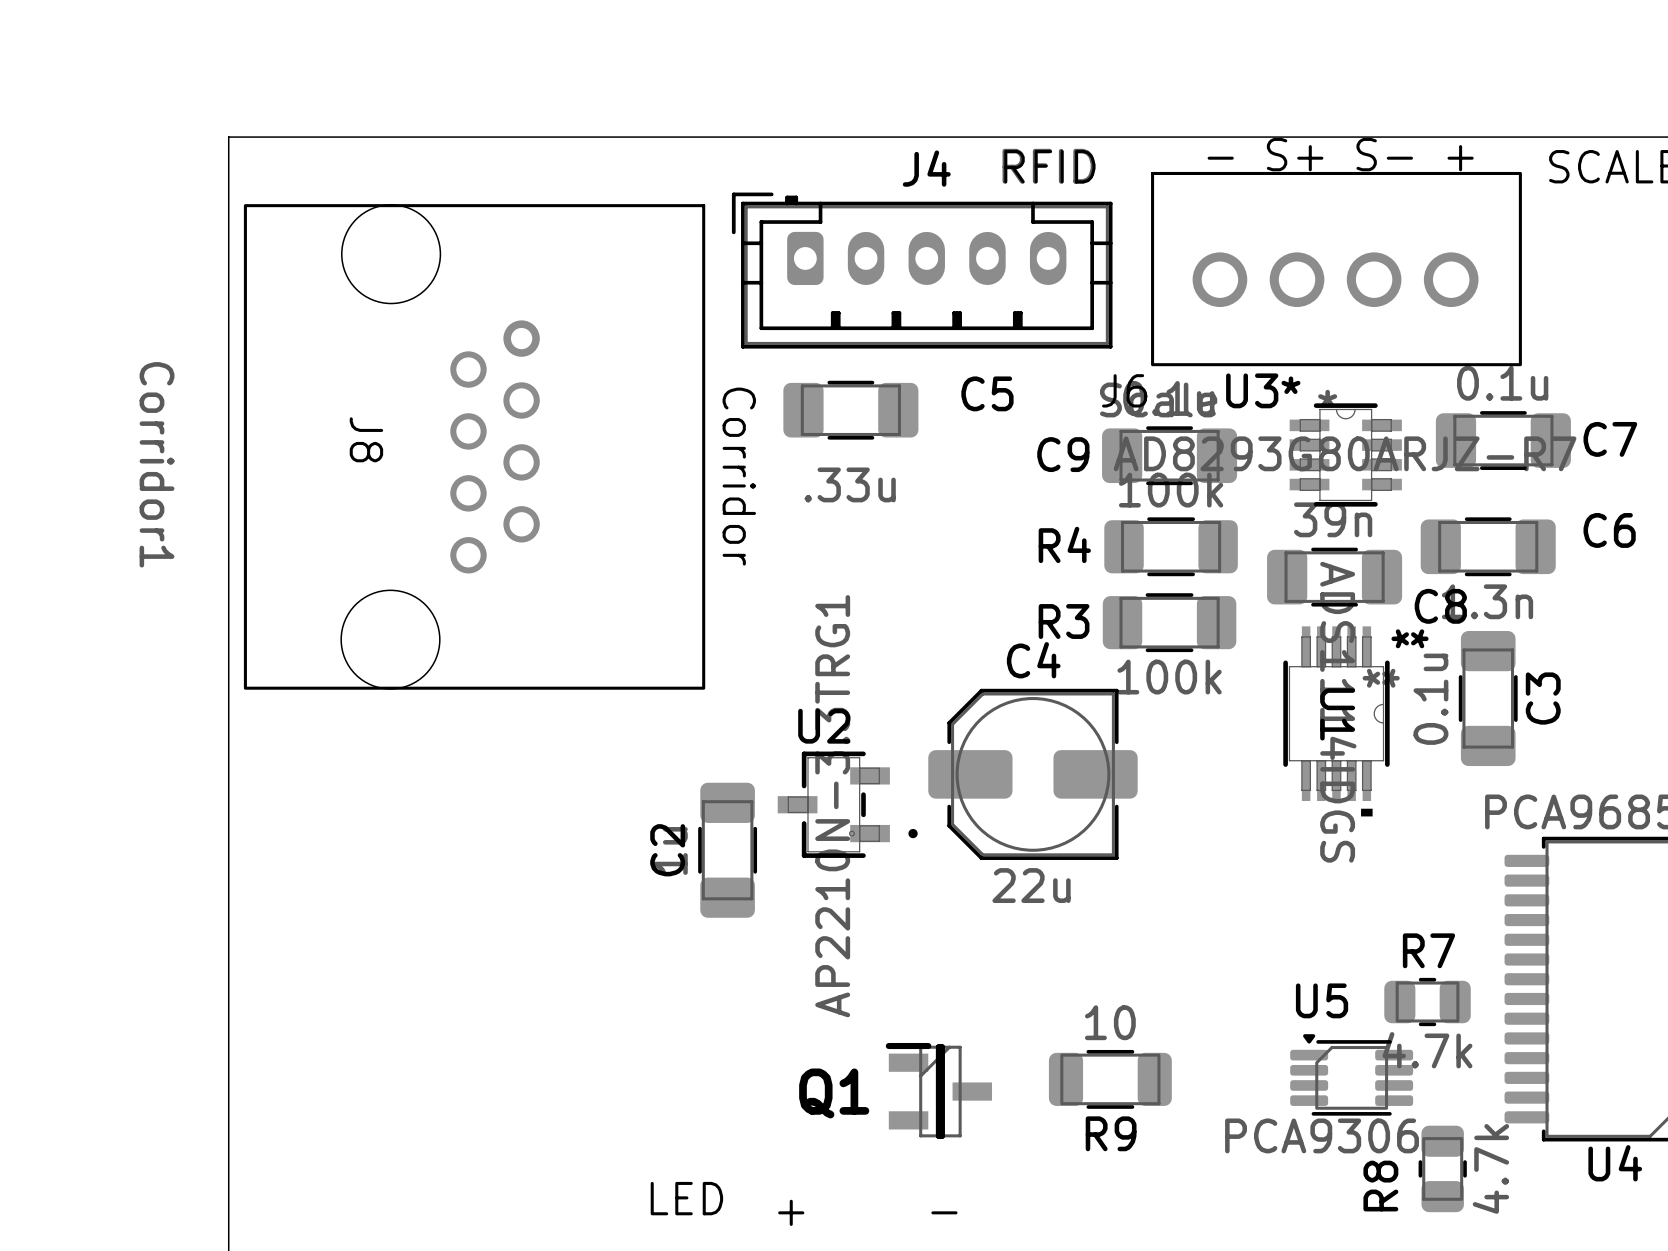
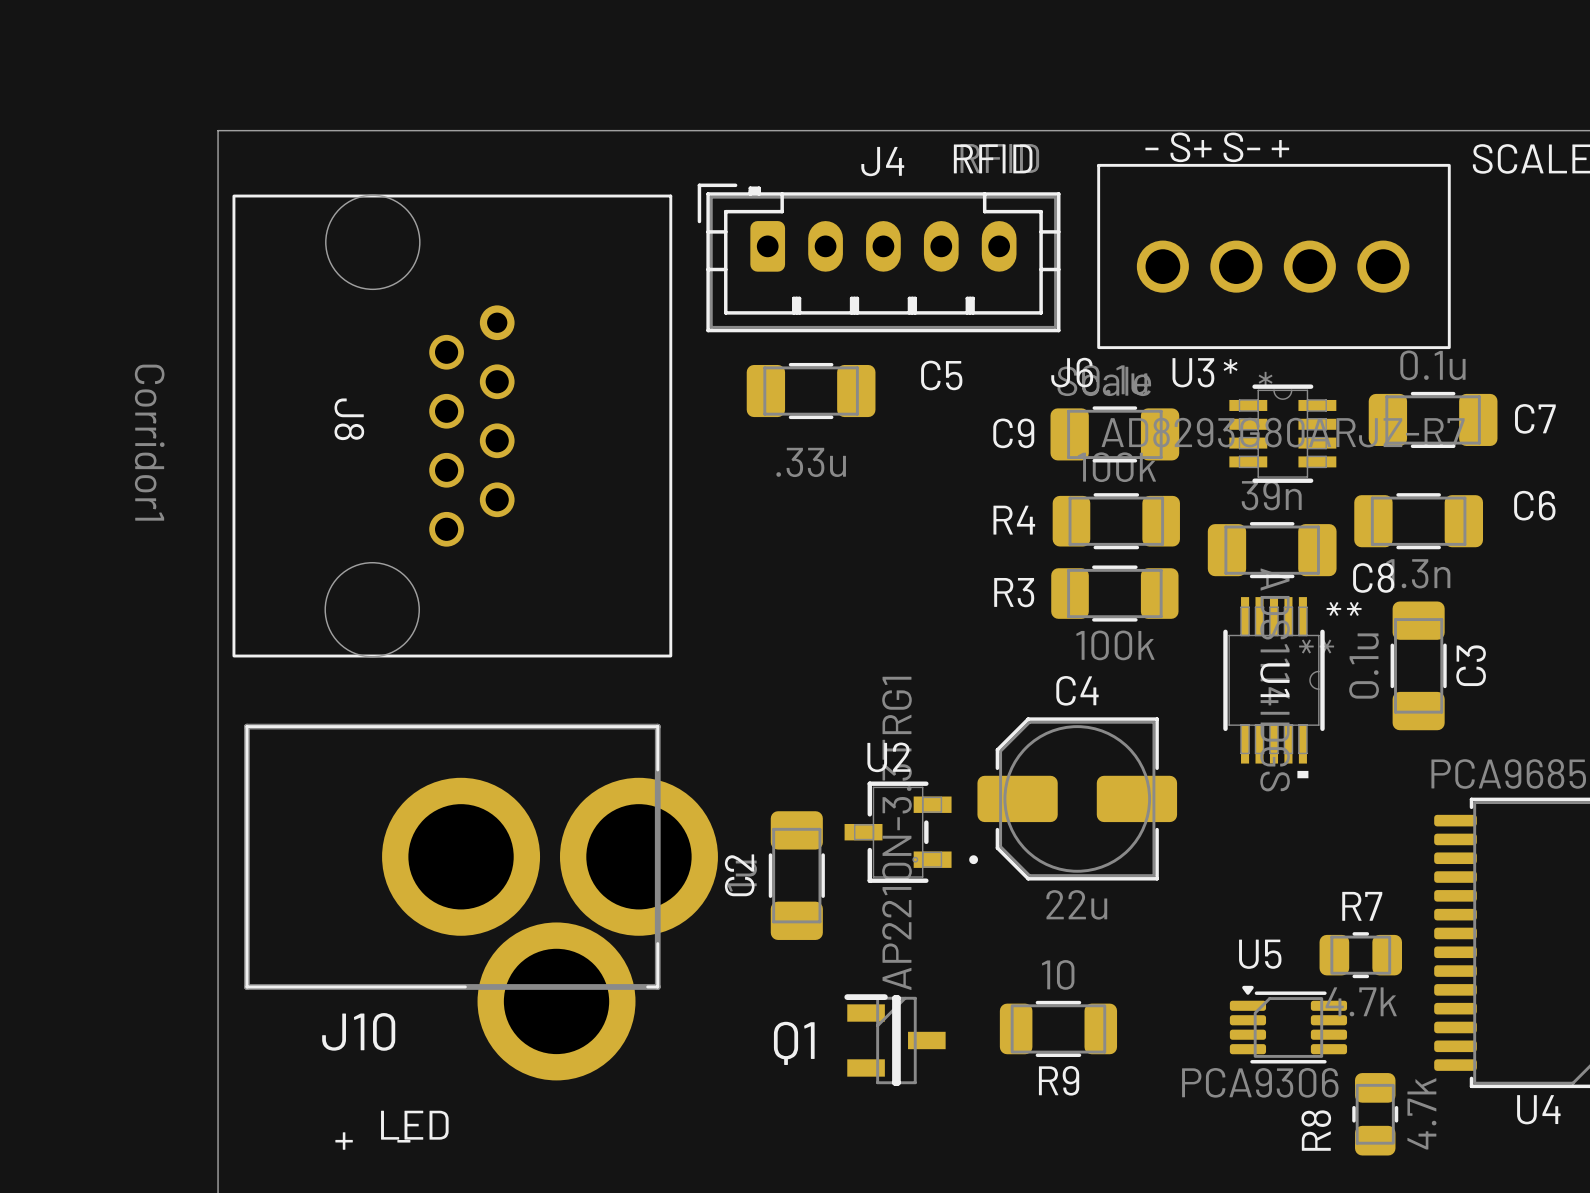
text: Corridor (739, 476) -> none
C4 position: (1032, 774) -> (1077, 798)
U2 position: (847, 804) -> (911, 832)
C2 position: (727, 850) -> (796, 875)
J10: none -> (481, 902)
text position: LED (686, 1198) -> LED (414, 1125)
text position: + - (867, 1212) -> + - (372, 1141)

